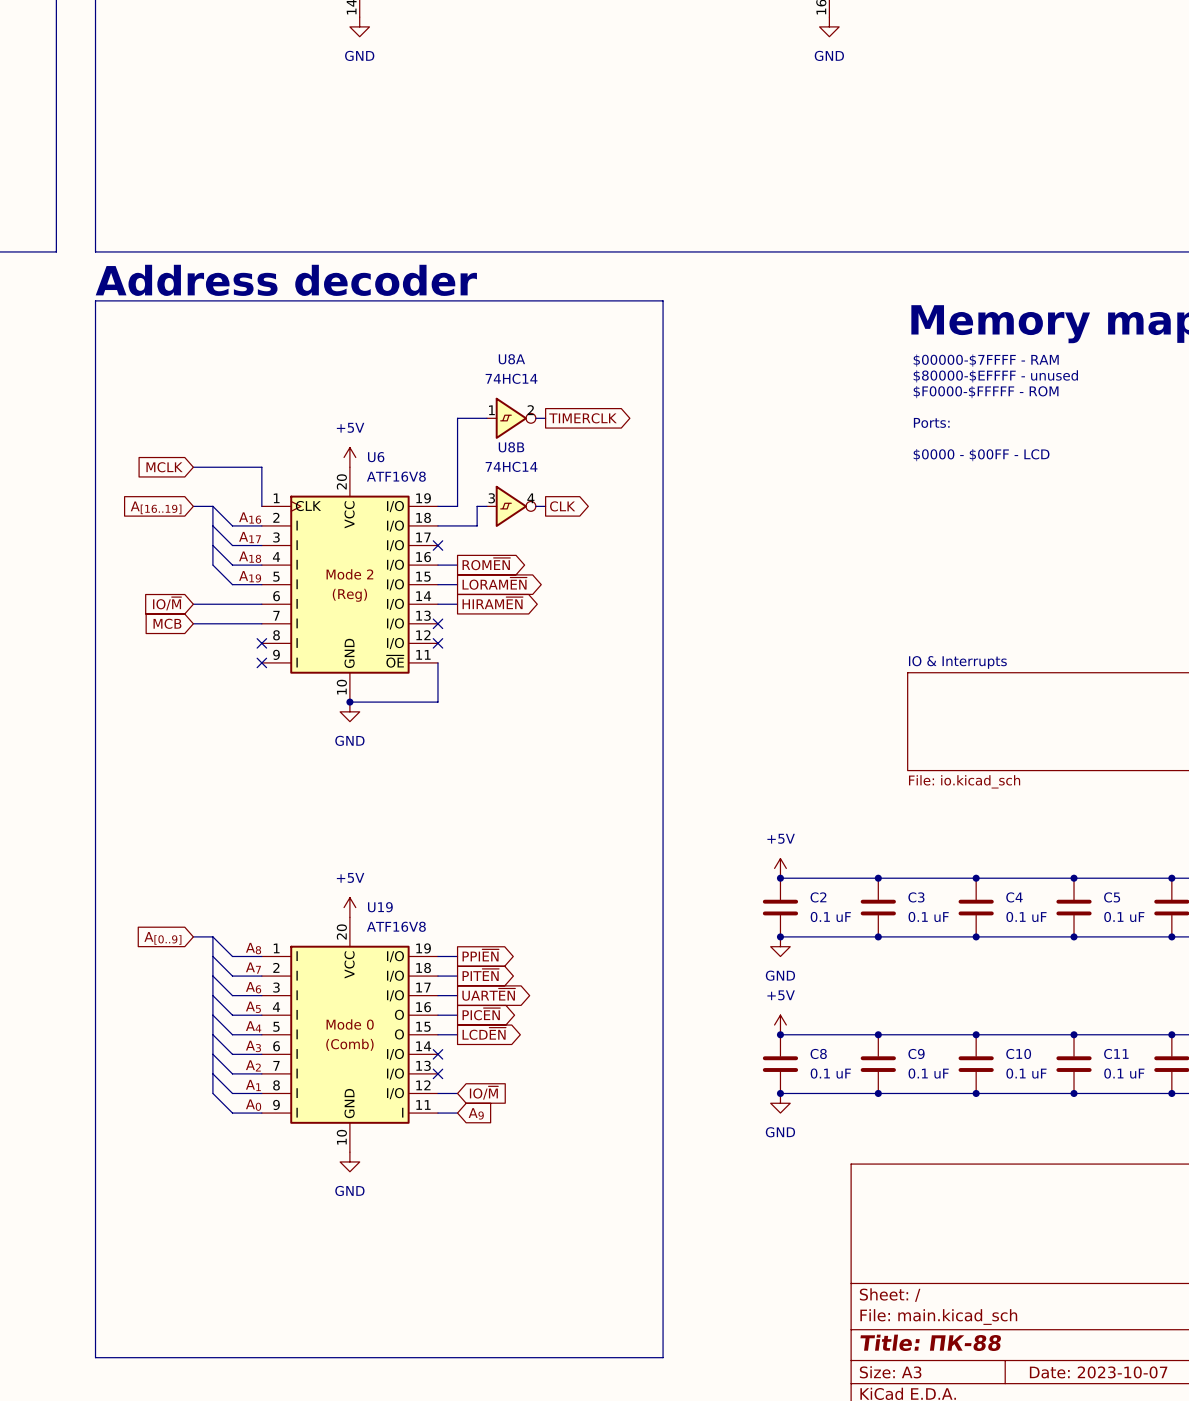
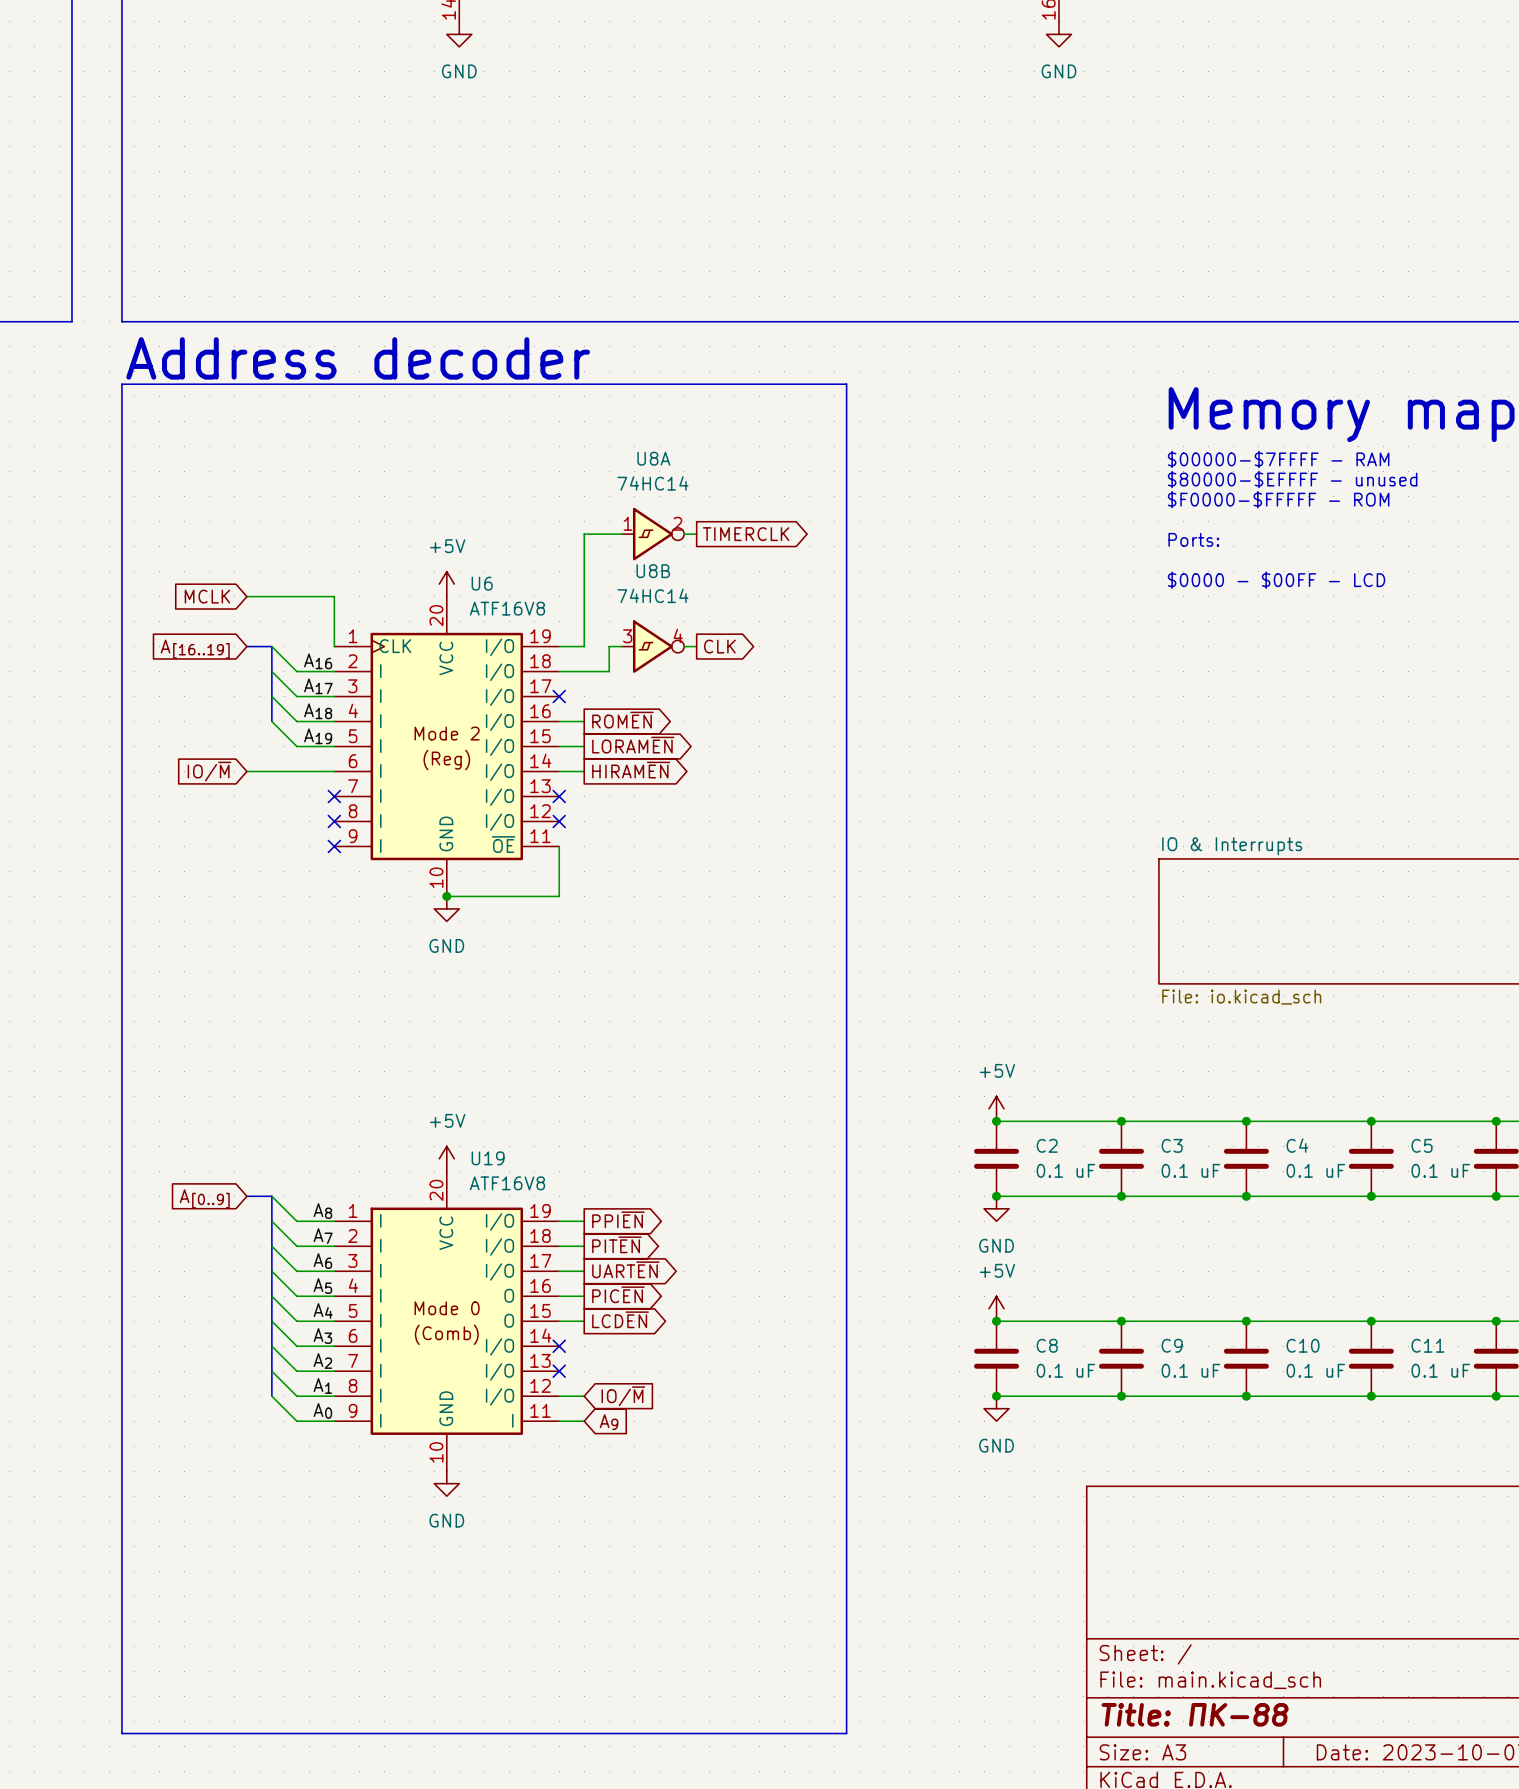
global label: MCB (167, 623) -> none
wire: (193, 623) (261, 623) -> none
no-connect mark: none -> (334, 796)

